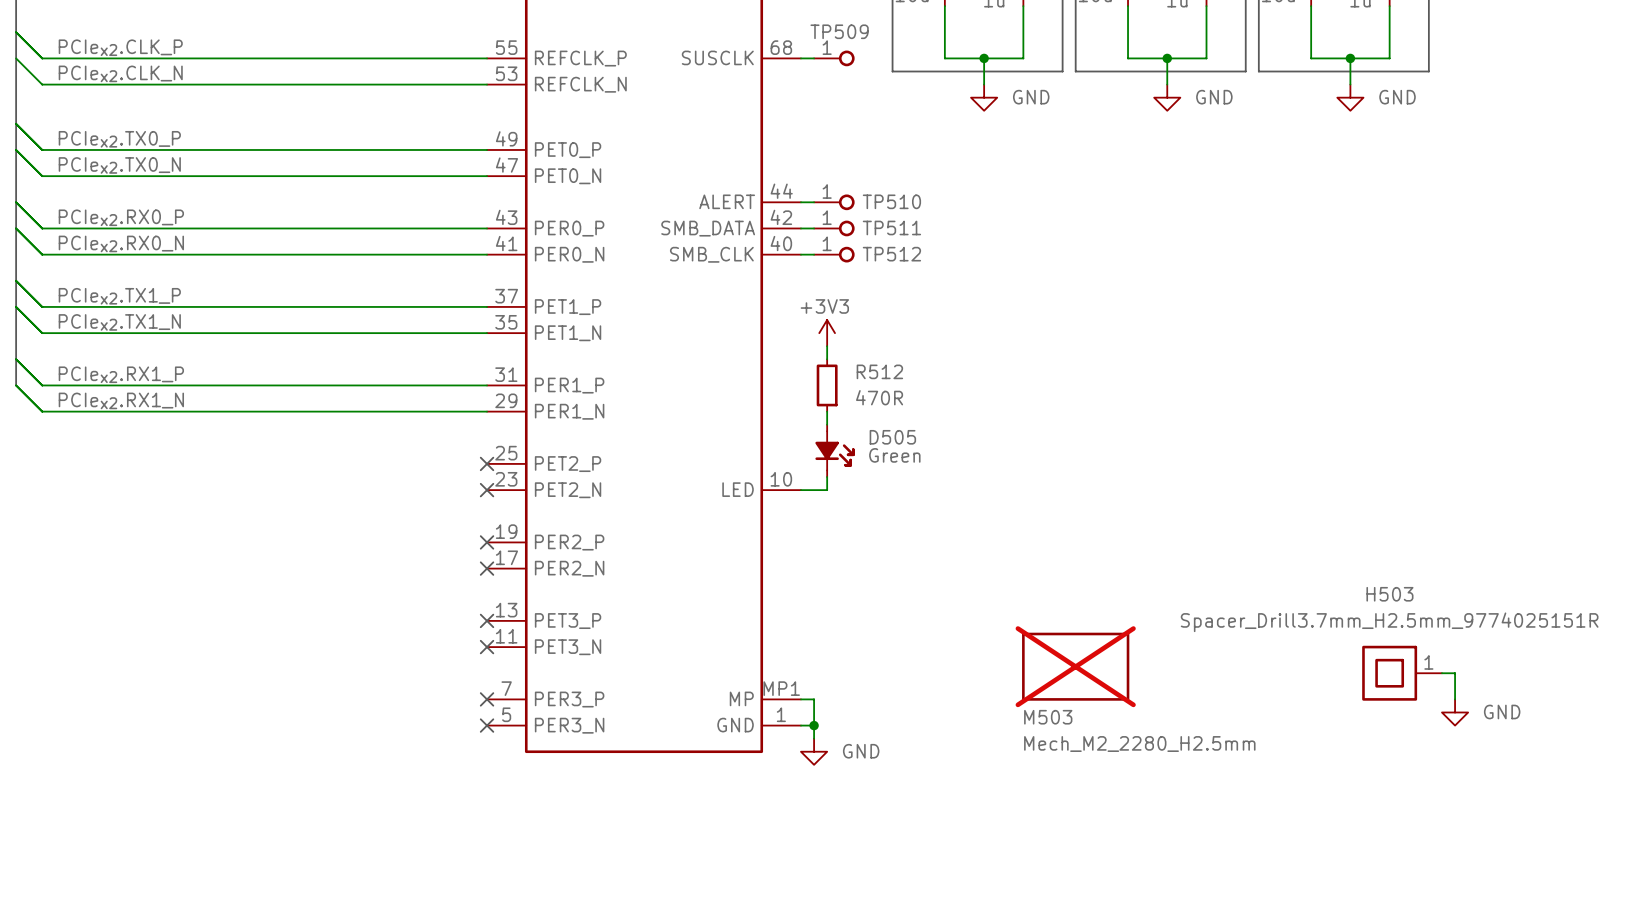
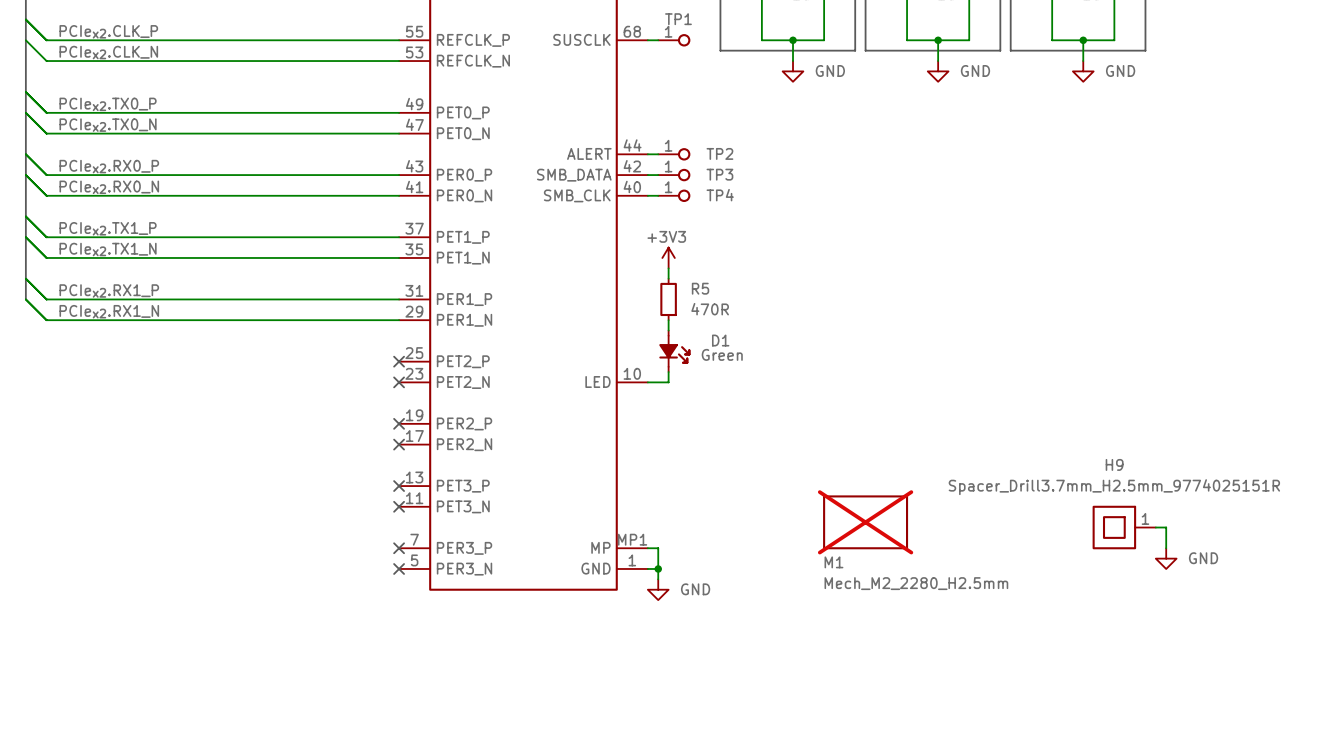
TP509 name: TP509 (839, 31) -> TP1 (678, 19)
TP510 name: TP510 (891, 201) -> TP2 (719, 153)
TP511 name: TP511 (891, 227) -> TP3 (719, 174)
TP512 name: TP512 (891, 254) -> TP4 (720, 195)
R512 name: R512 (879, 371) -> R5 (700, 288)
D505 name: D505 (892, 437) -> D1 (720, 340)
H503 name: H503 (1389, 594) -> H9 (1114, 464)
M503 name: M503 (1048, 717) -> M1 (833, 562)

